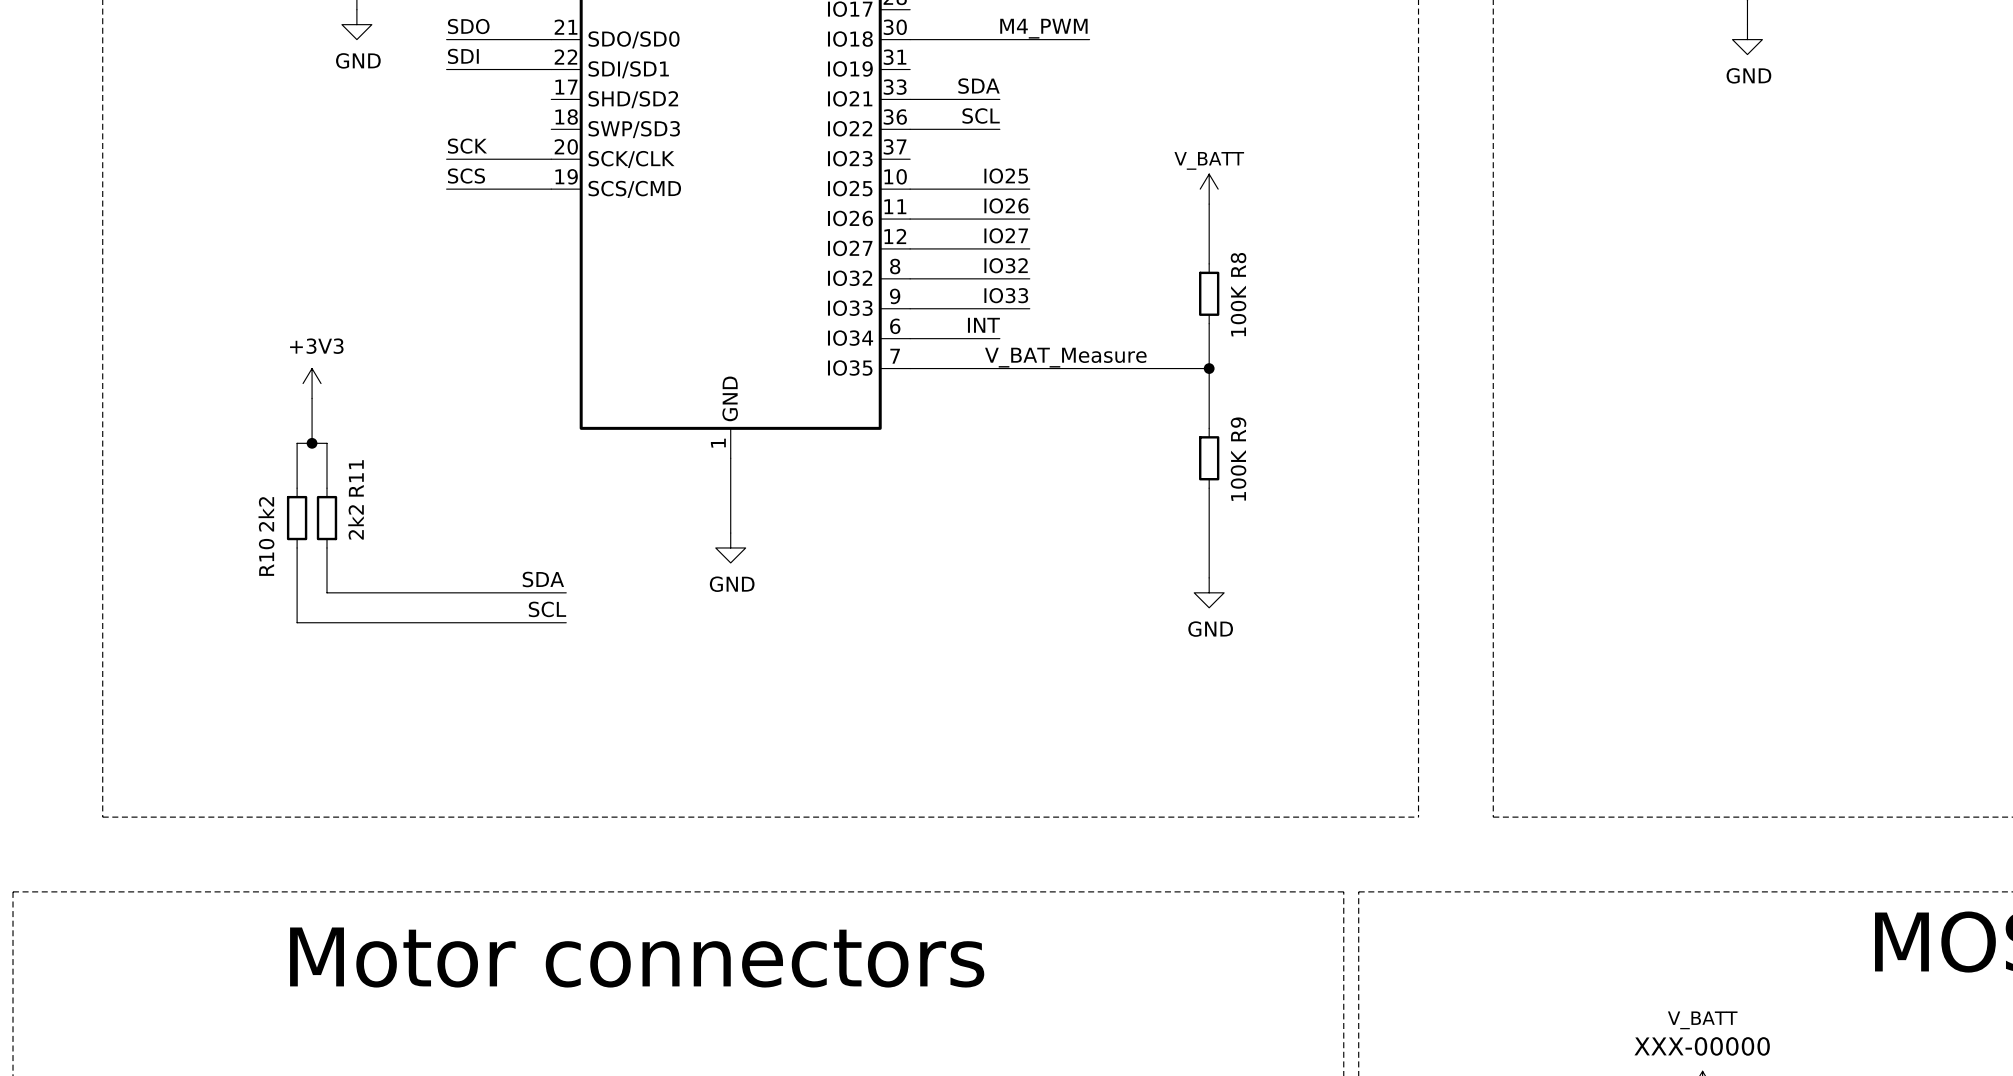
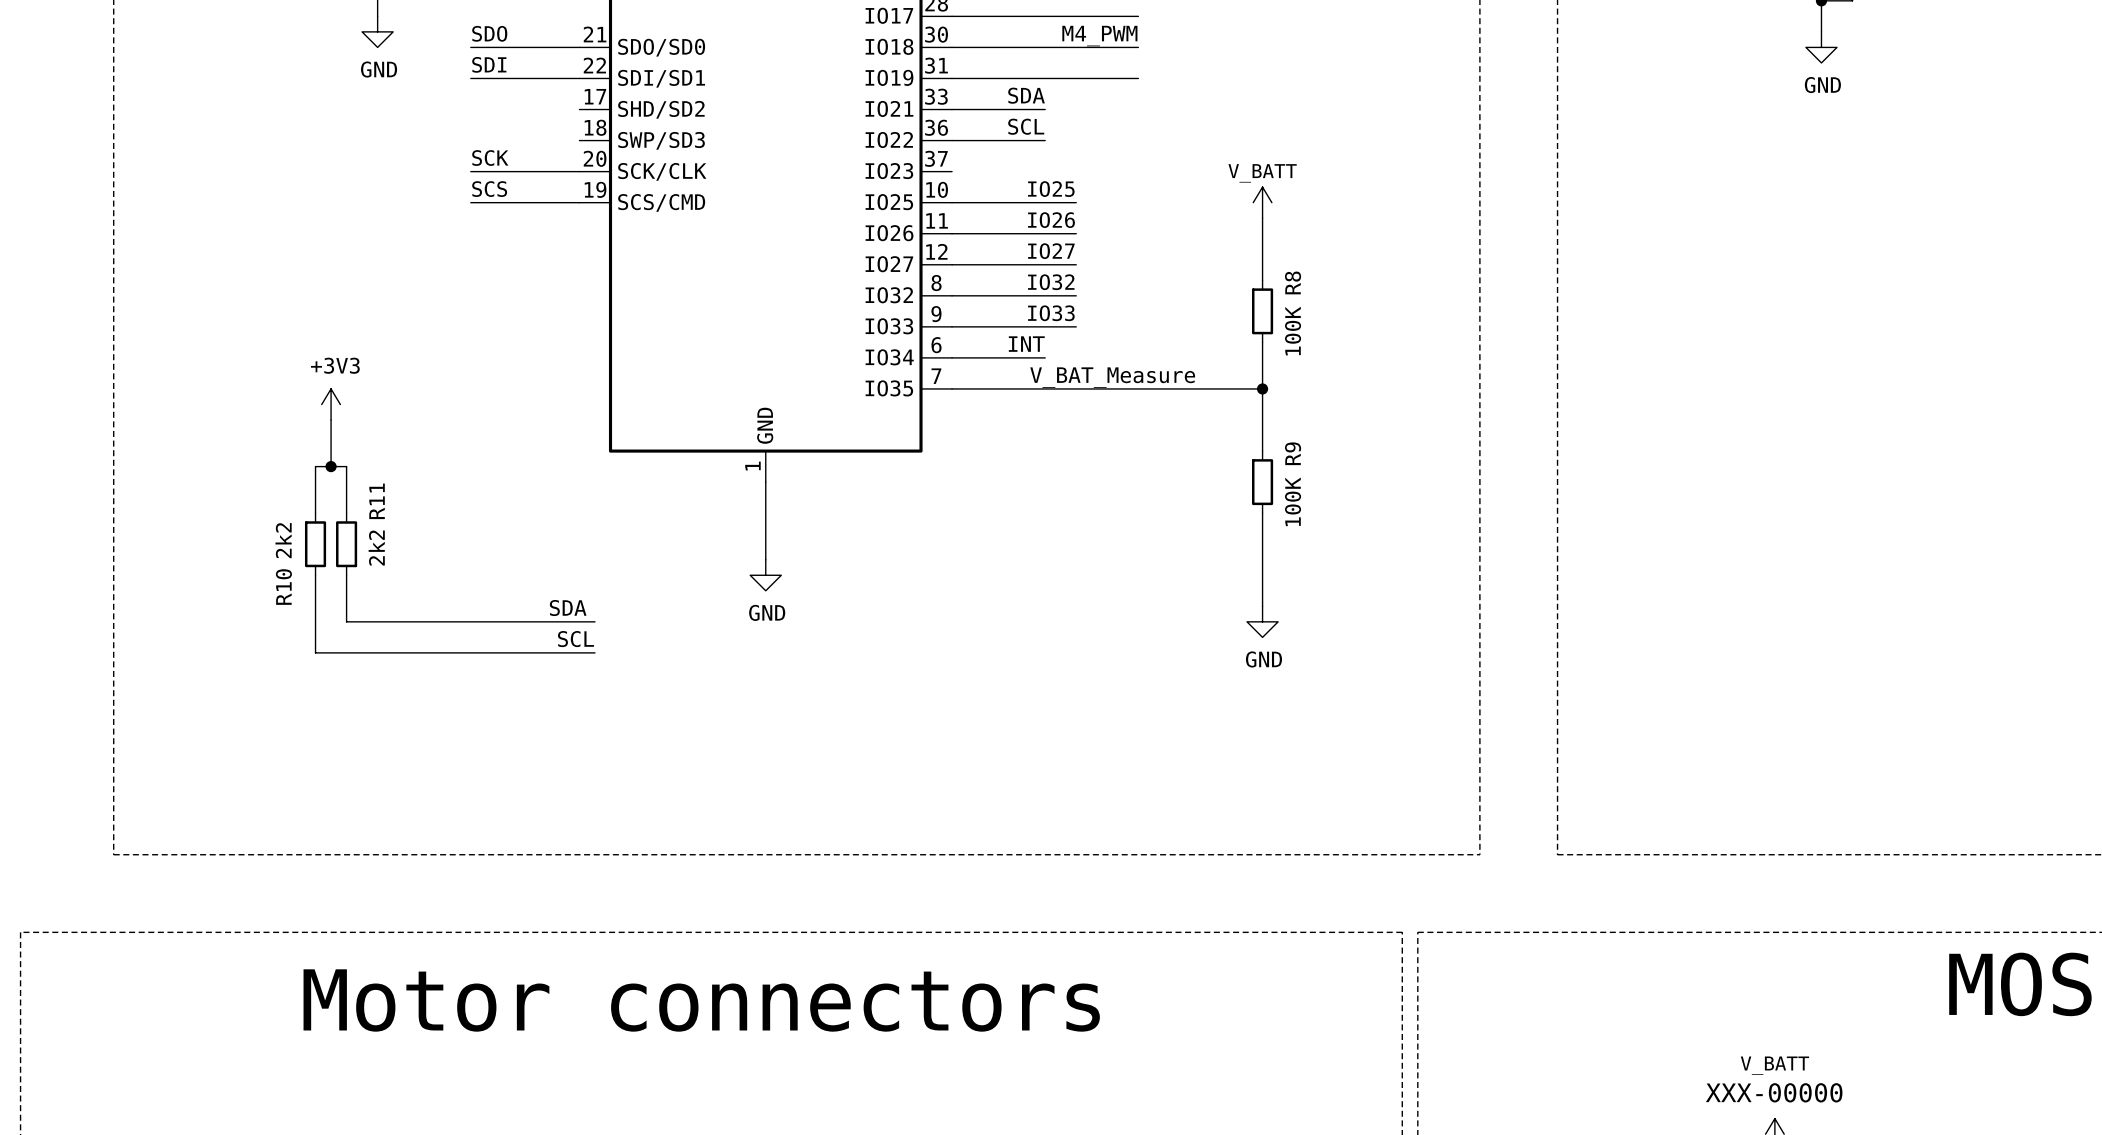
wire: none -> (952, 16) (1138, 16)
wire: none -> (952, 78) (1138, 78)

